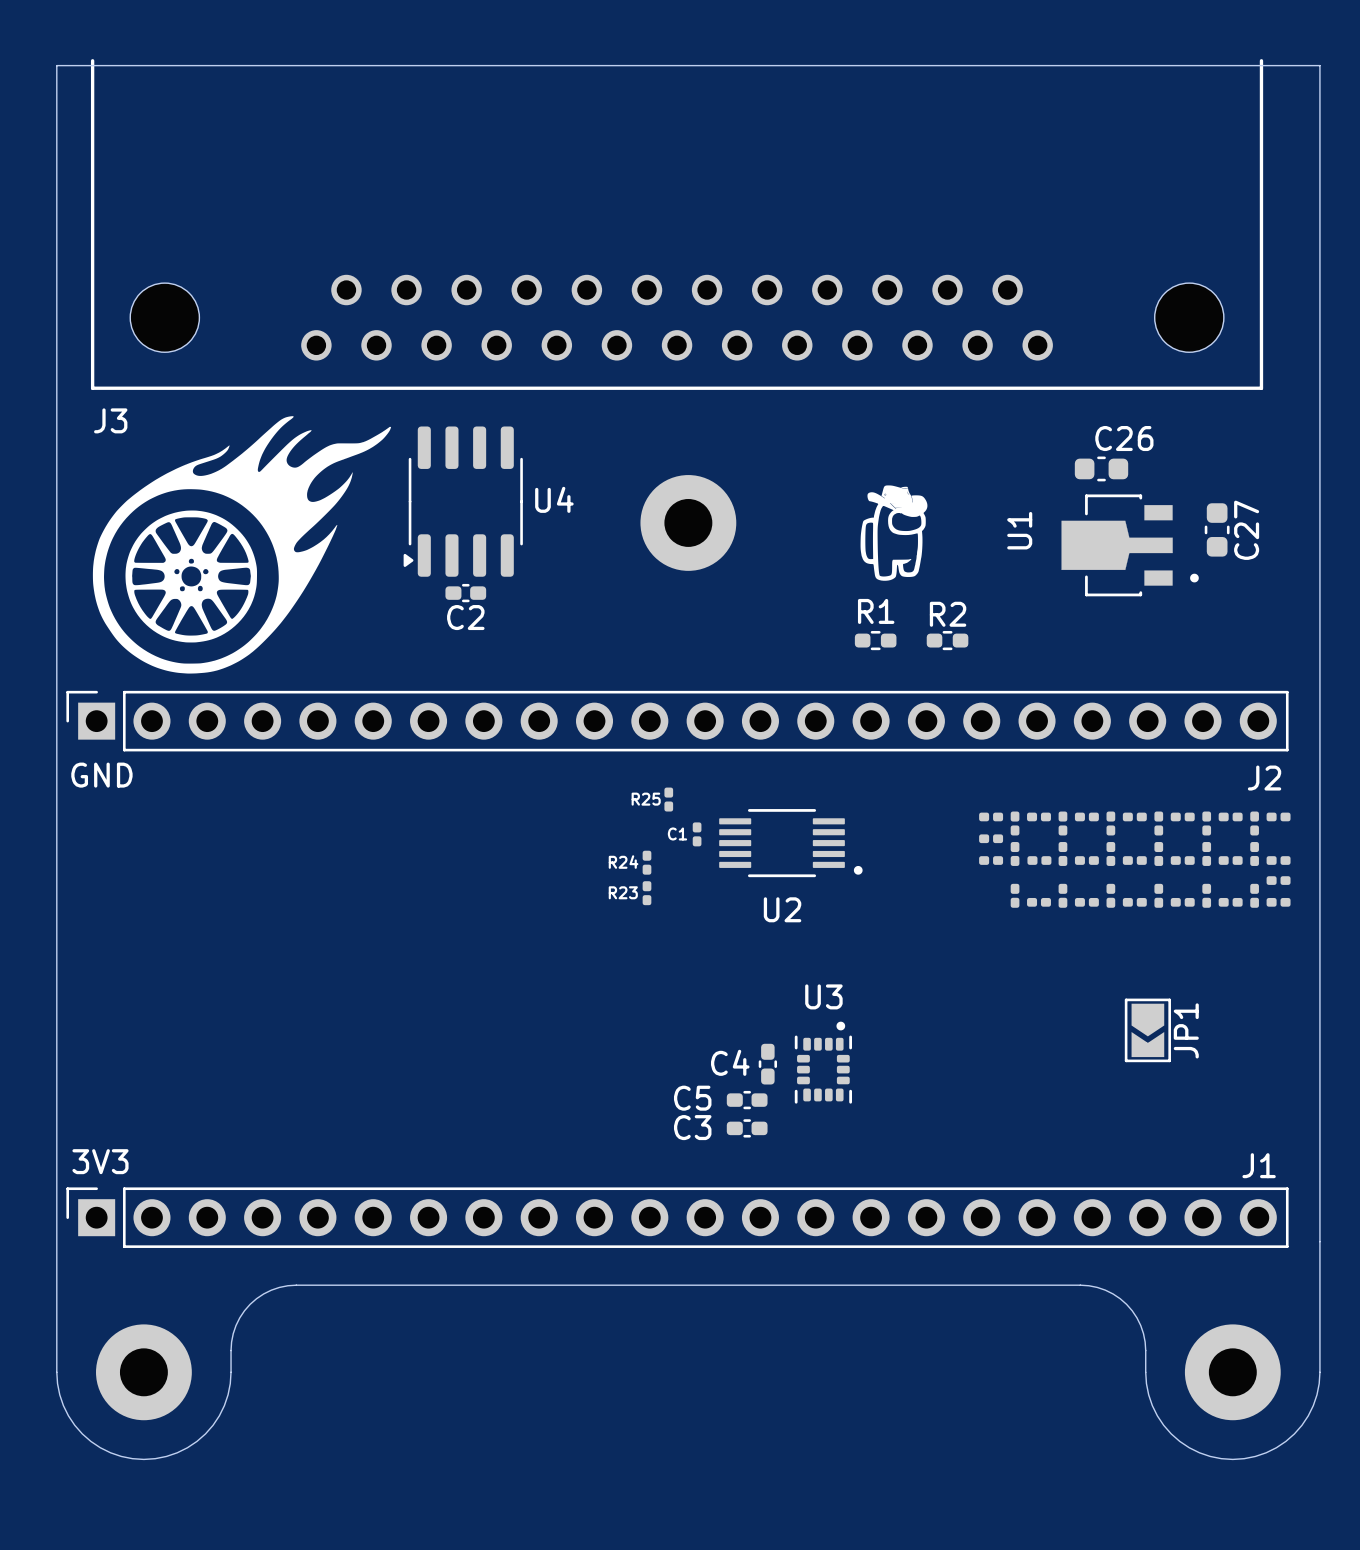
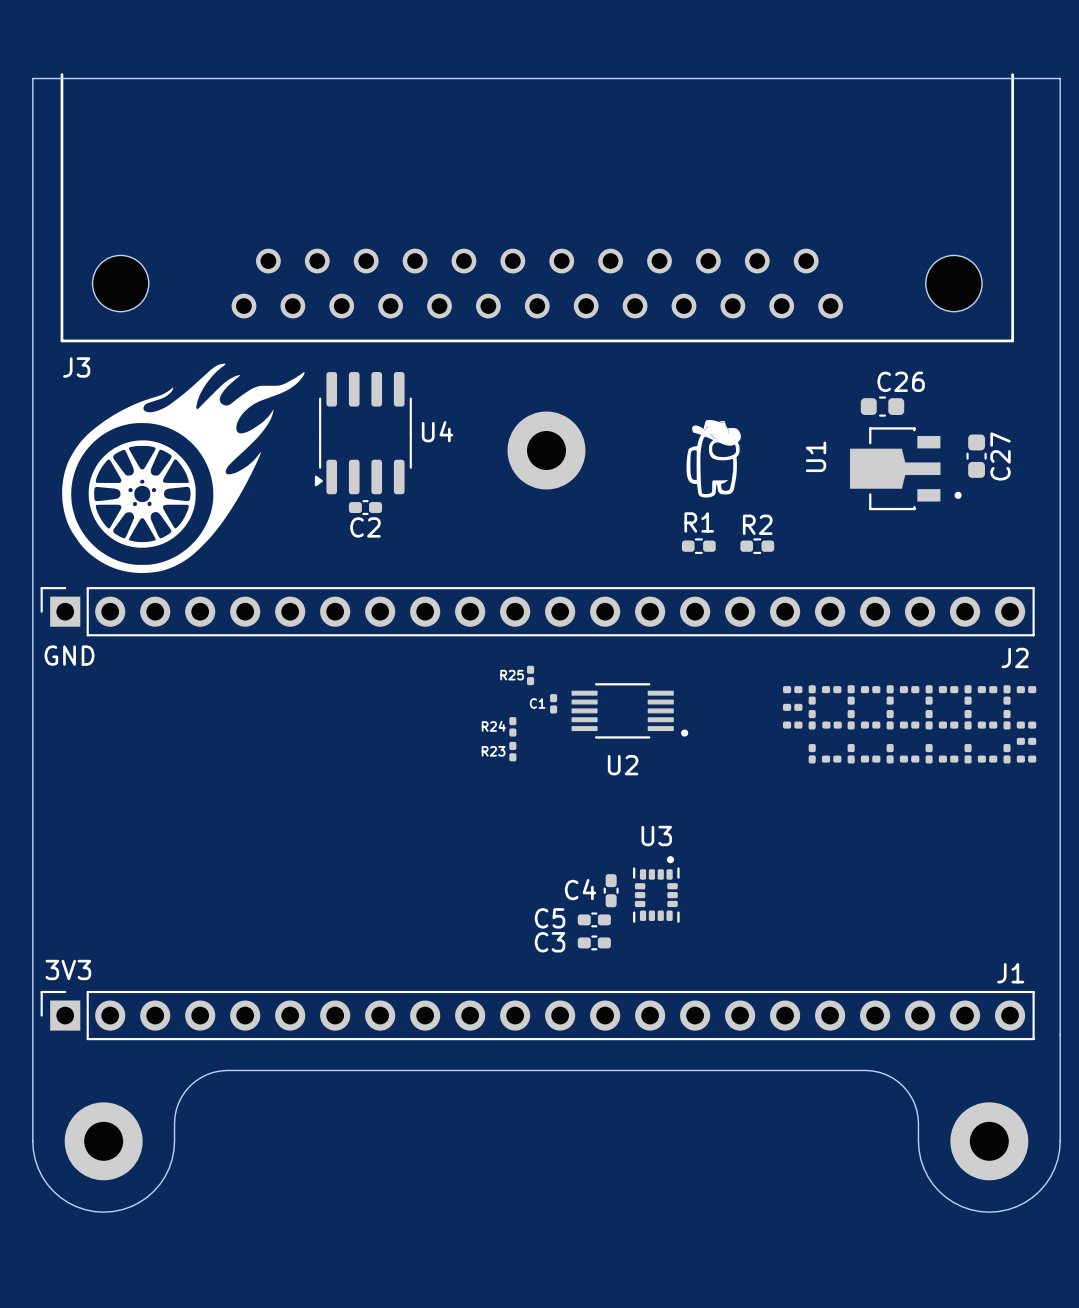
JP1: (1147, 1030) -> none

